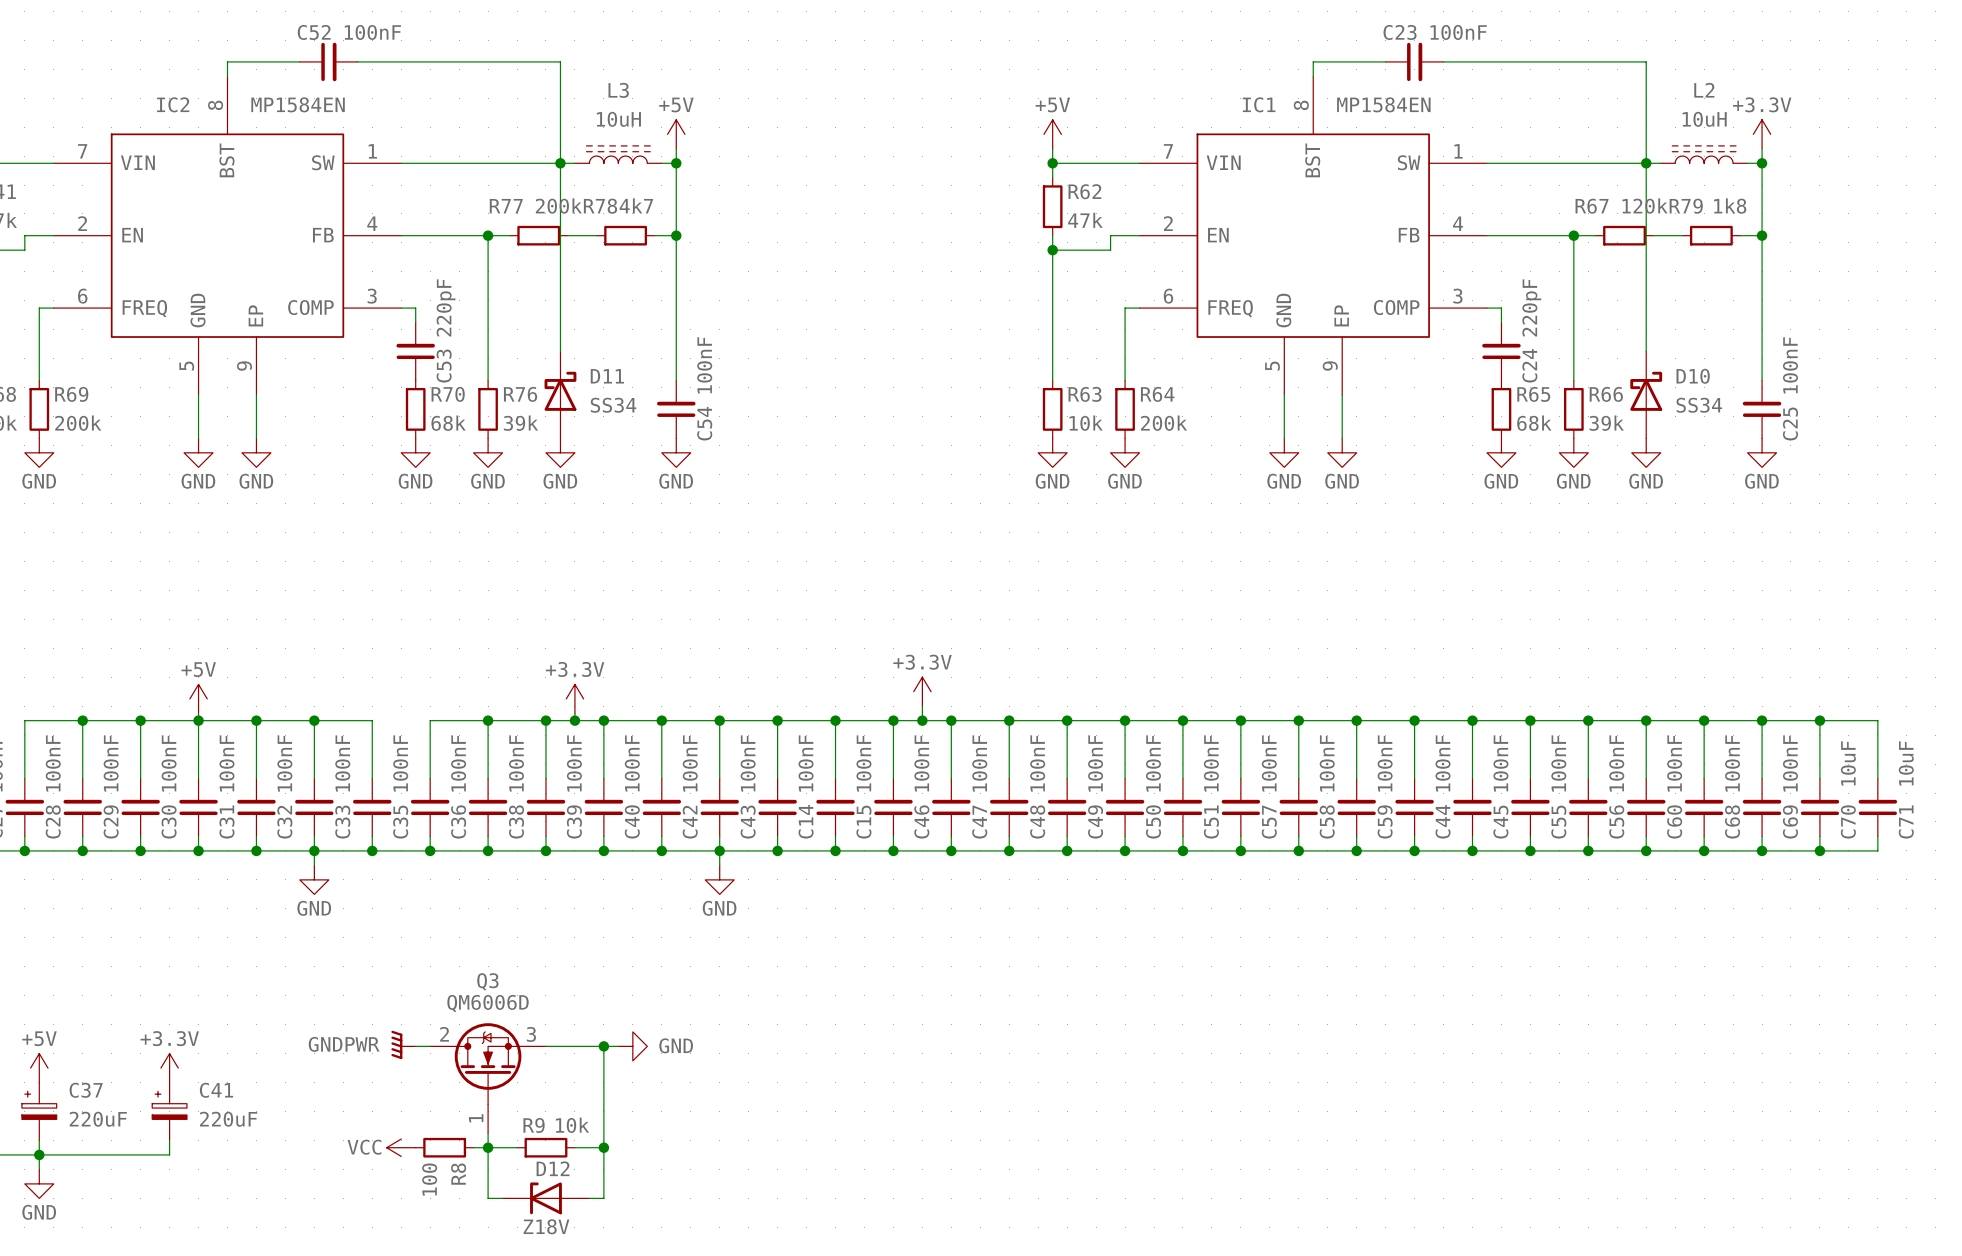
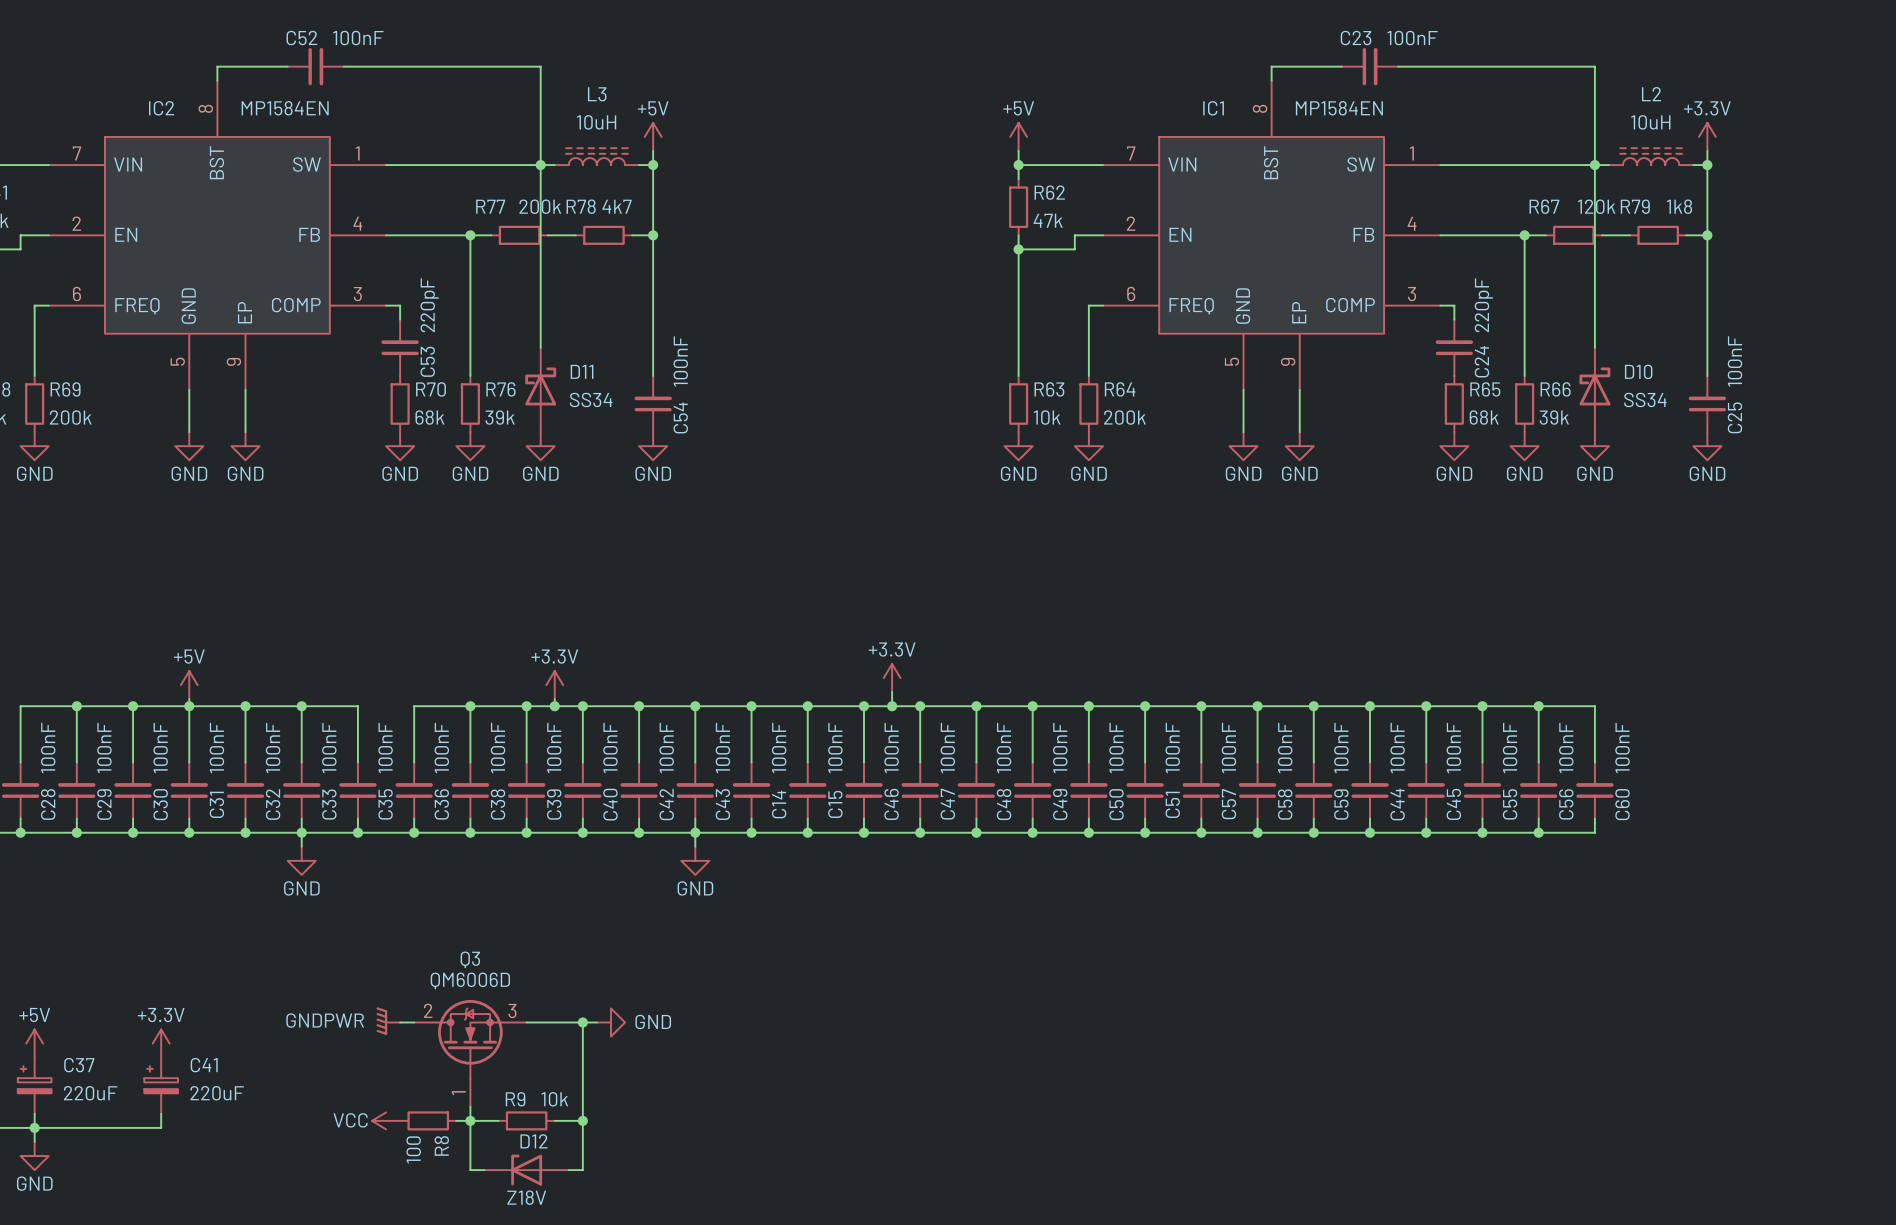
wire: (1646, 720) (1877, 720) (1877, 778) -> none
junction: (1646, 720) -> none
wire: (1704, 720) (1704, 778) -> none
junction: (1704, 720) -> none
wire: (1762, 720) (1762, 778) -> none
junction: (1762, 720) -> none
wire: (1819, 720) (1819, 778) -> none
junction: (1819, 720) -> none
C68: 100nF (1704, 807) -> none
C69: 100nF (1762, 807) -> none
C70: 10uF (1819, 807) -> none
C71: 10uF (1877, 807) -> none
wire: (1704, 836) (1704, 850) -> none
wire: (1762, 836) (1762, 850) -> none
wire: (1819, 836) (1819, 850) -> none
wire: (1877, 836) (1877, 850) (1646, 850) -> none
junction: (1646, 850) -> none
junction: (1704, 850) -> none
junction: (1762, 850) -> none
junction: (1819, 850) -> none

